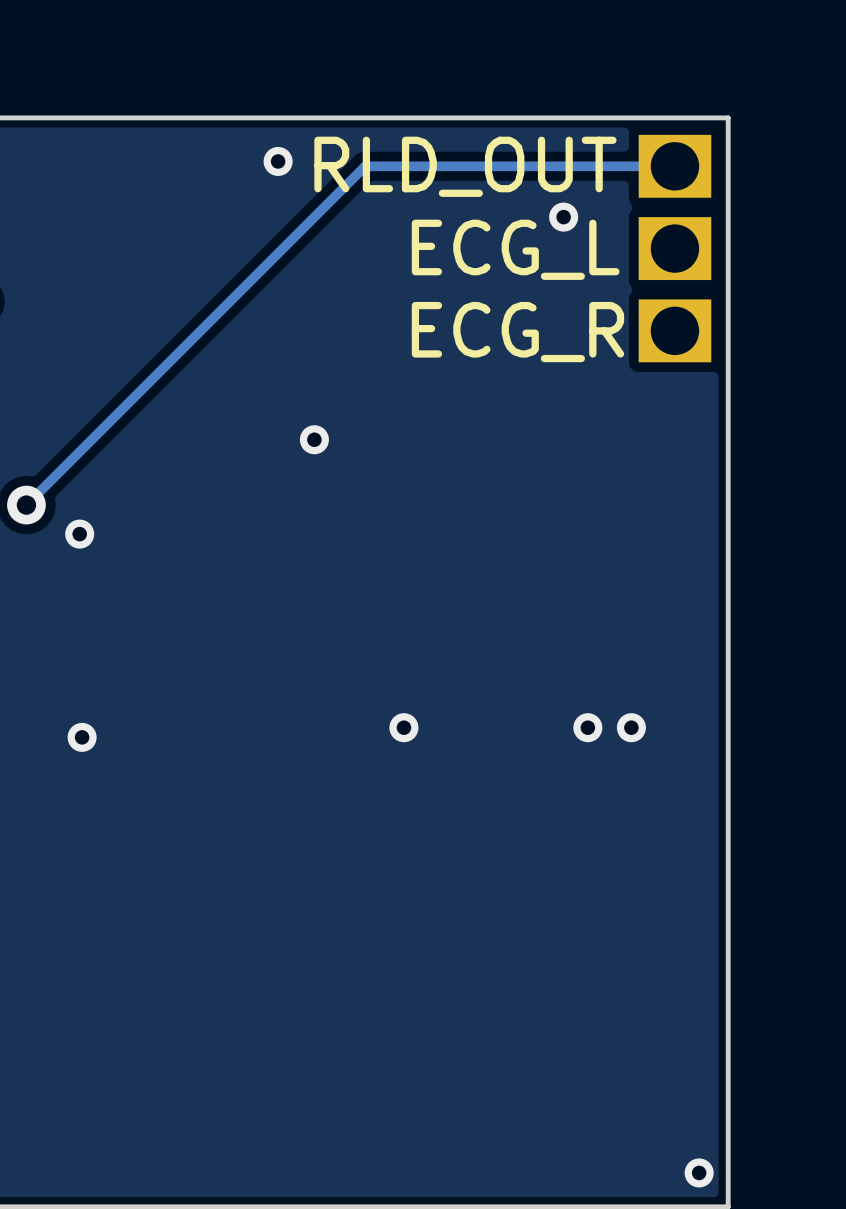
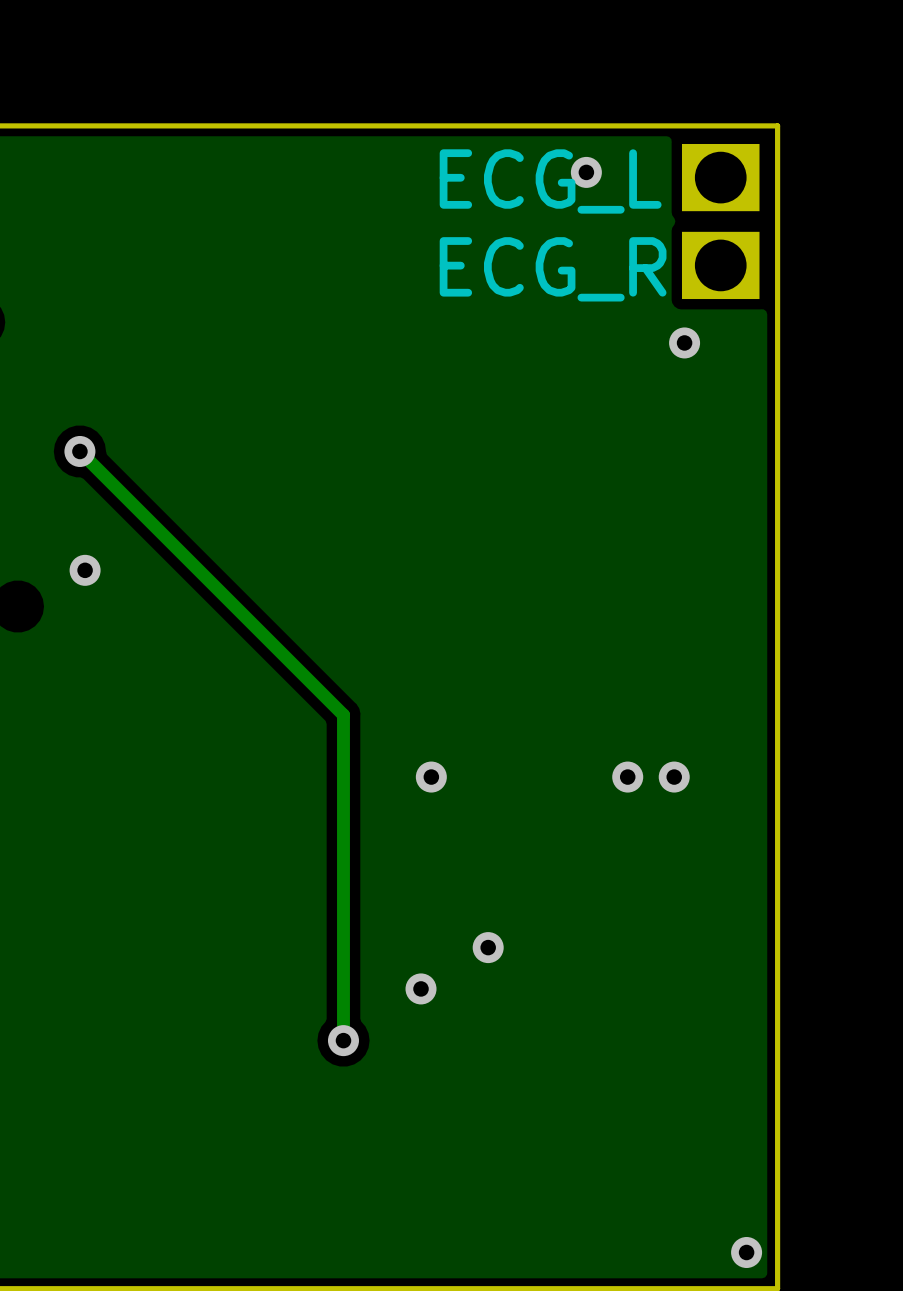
via: (278, 161) -> none
track: (674, 166) (365, 166) (26, 505) -> none
text: none -> ECG_L (550, 181)
via position: (563, 217) -> (586, 172)
text: ECG_L (515, 249) -> ECG_R (553, 269)
via: none -> (684, 342)
part: (674, 330) -> none
text: ECG_R (517, 332) -> none
track: none -> (79, 451) (343, 715) (343, 1040)
via: none -> (79, 451)
via: (314, 439) -> none
via: (26, 505) -> none
via: (82, 737) -> none
via: none -> (488, 947)
via: none -> (421, 988)
via: none -> (343, 1040)

